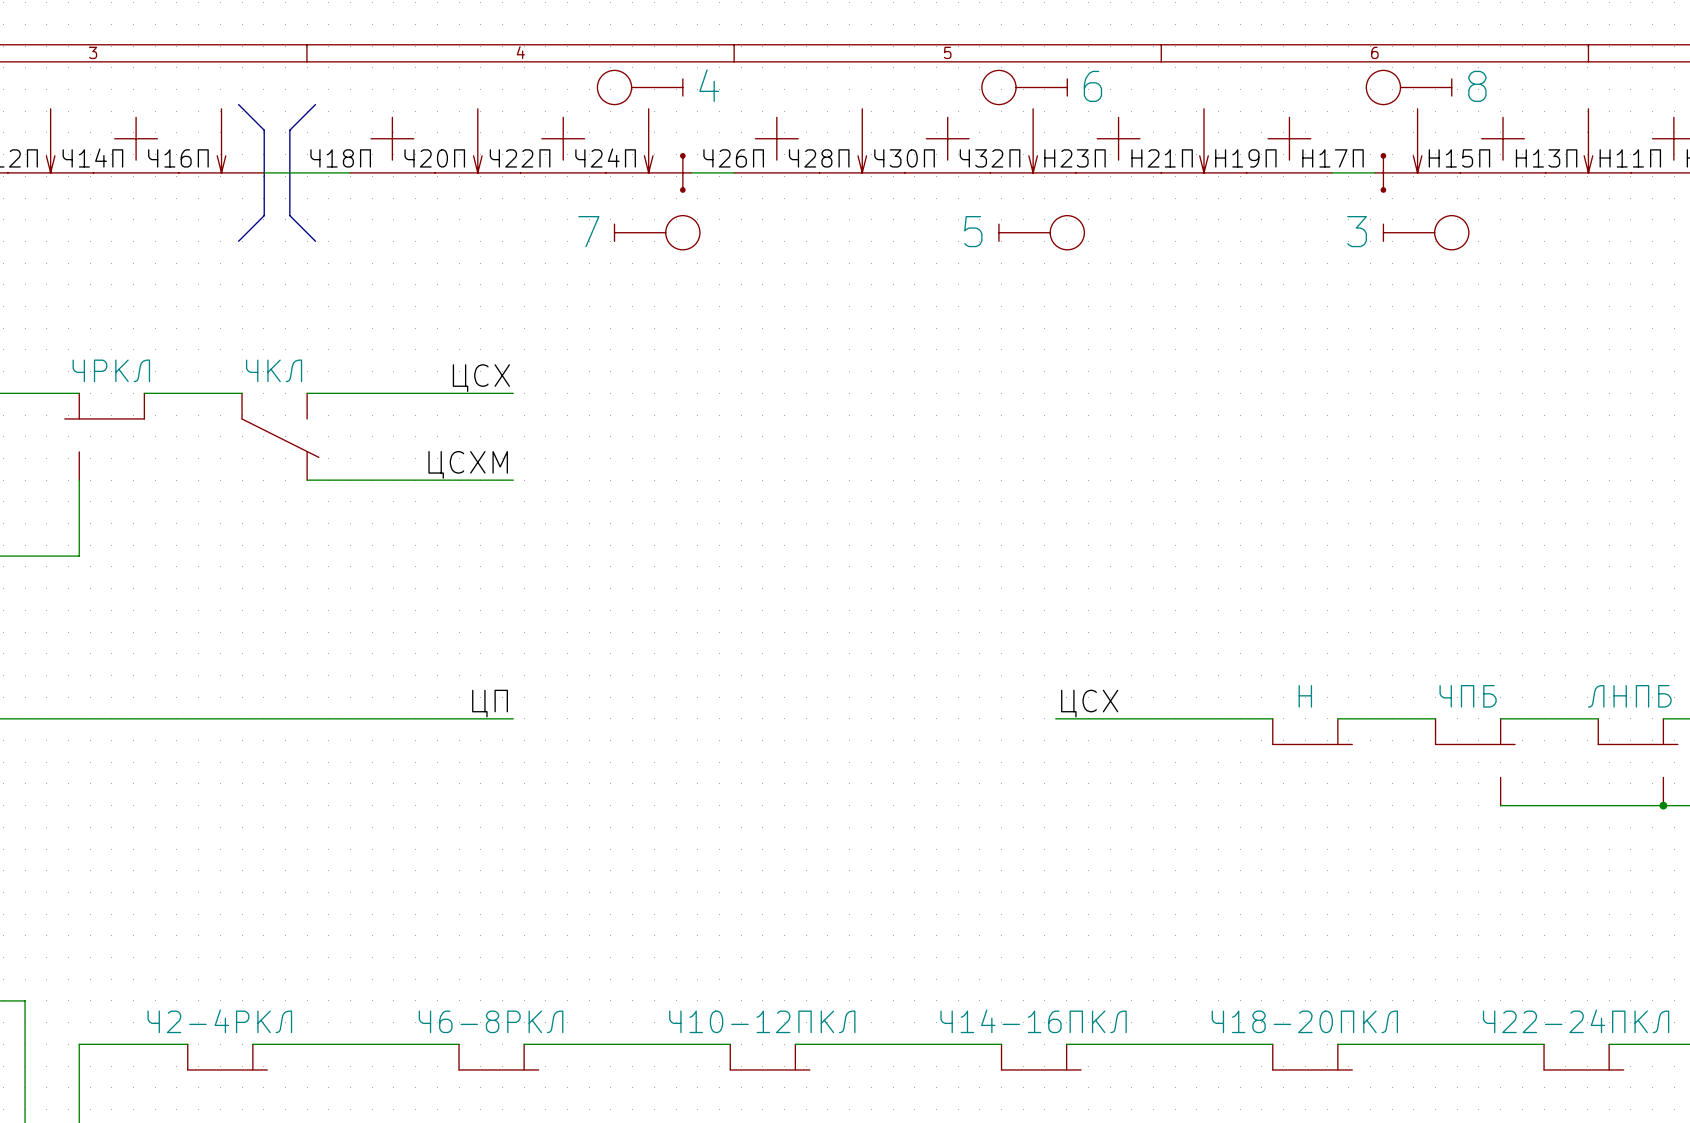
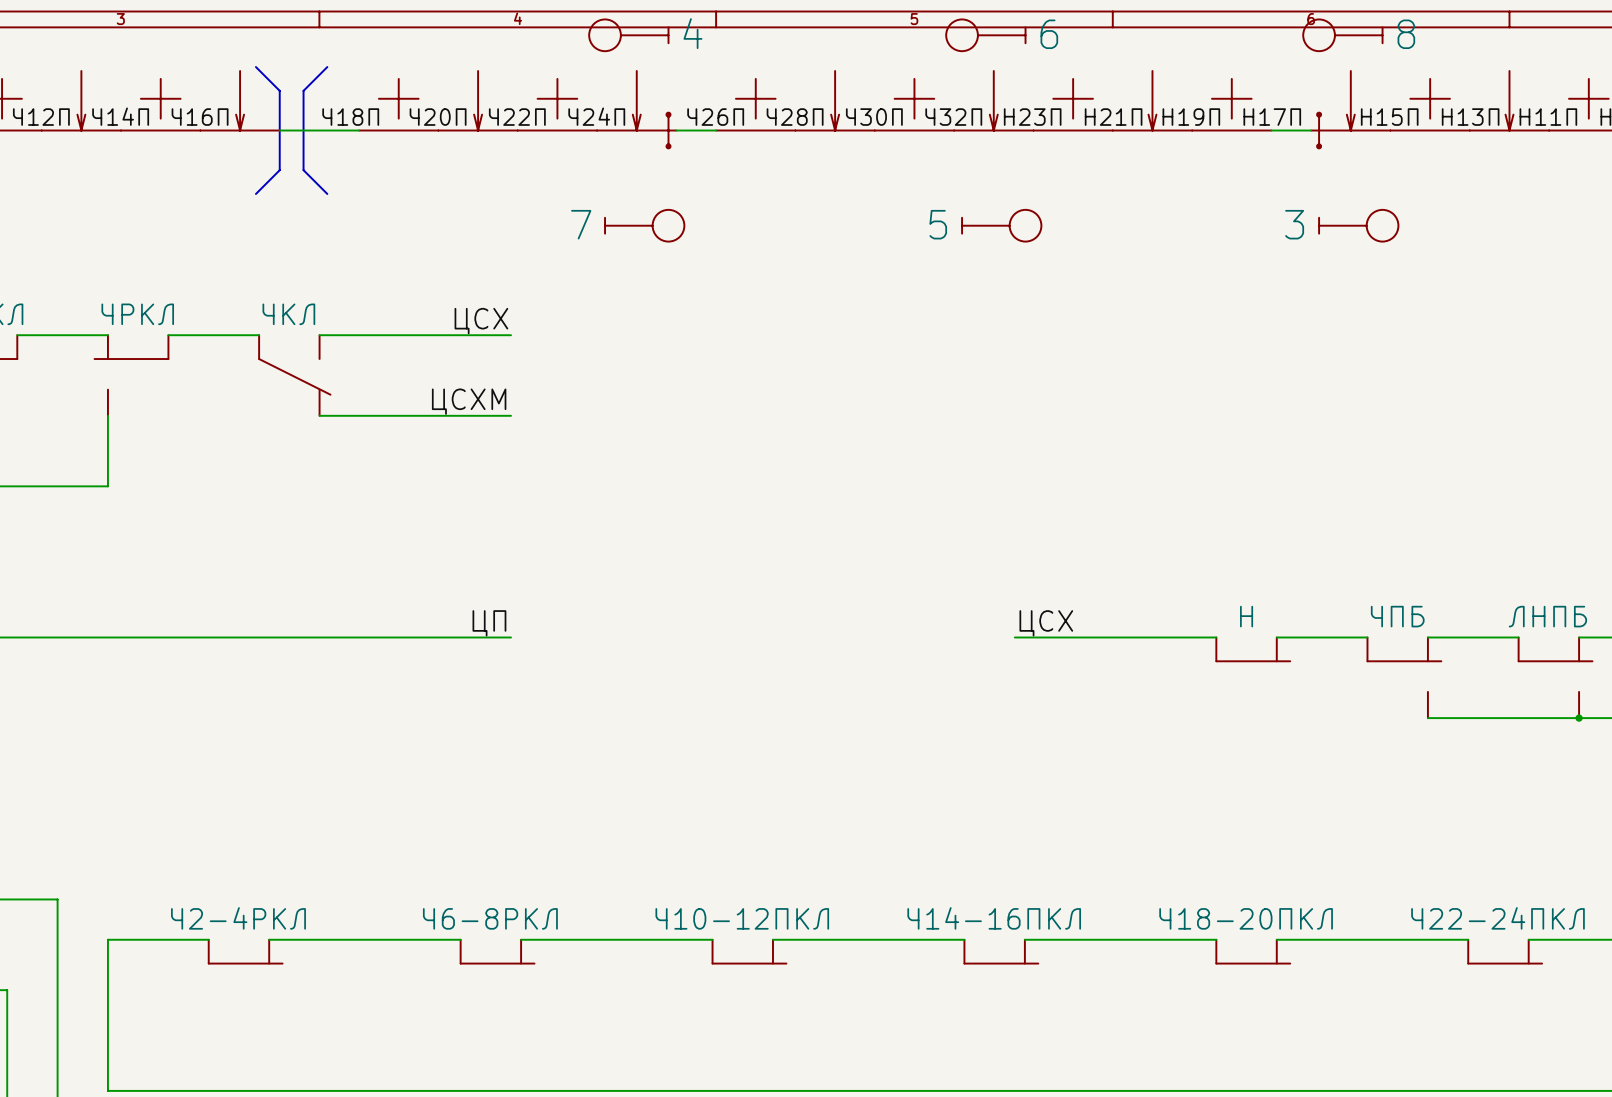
part position: (640, 87) -> (628, 35)
part position: (1024, 87) -> (985, 35)
part position: (1409, 87) -> (1342, 35)
part position: (657, 232) -> (644, 225)
part position: (1041, 232) -> (1001, 225)
part position: (1426, 232) -> (1358, 225)

